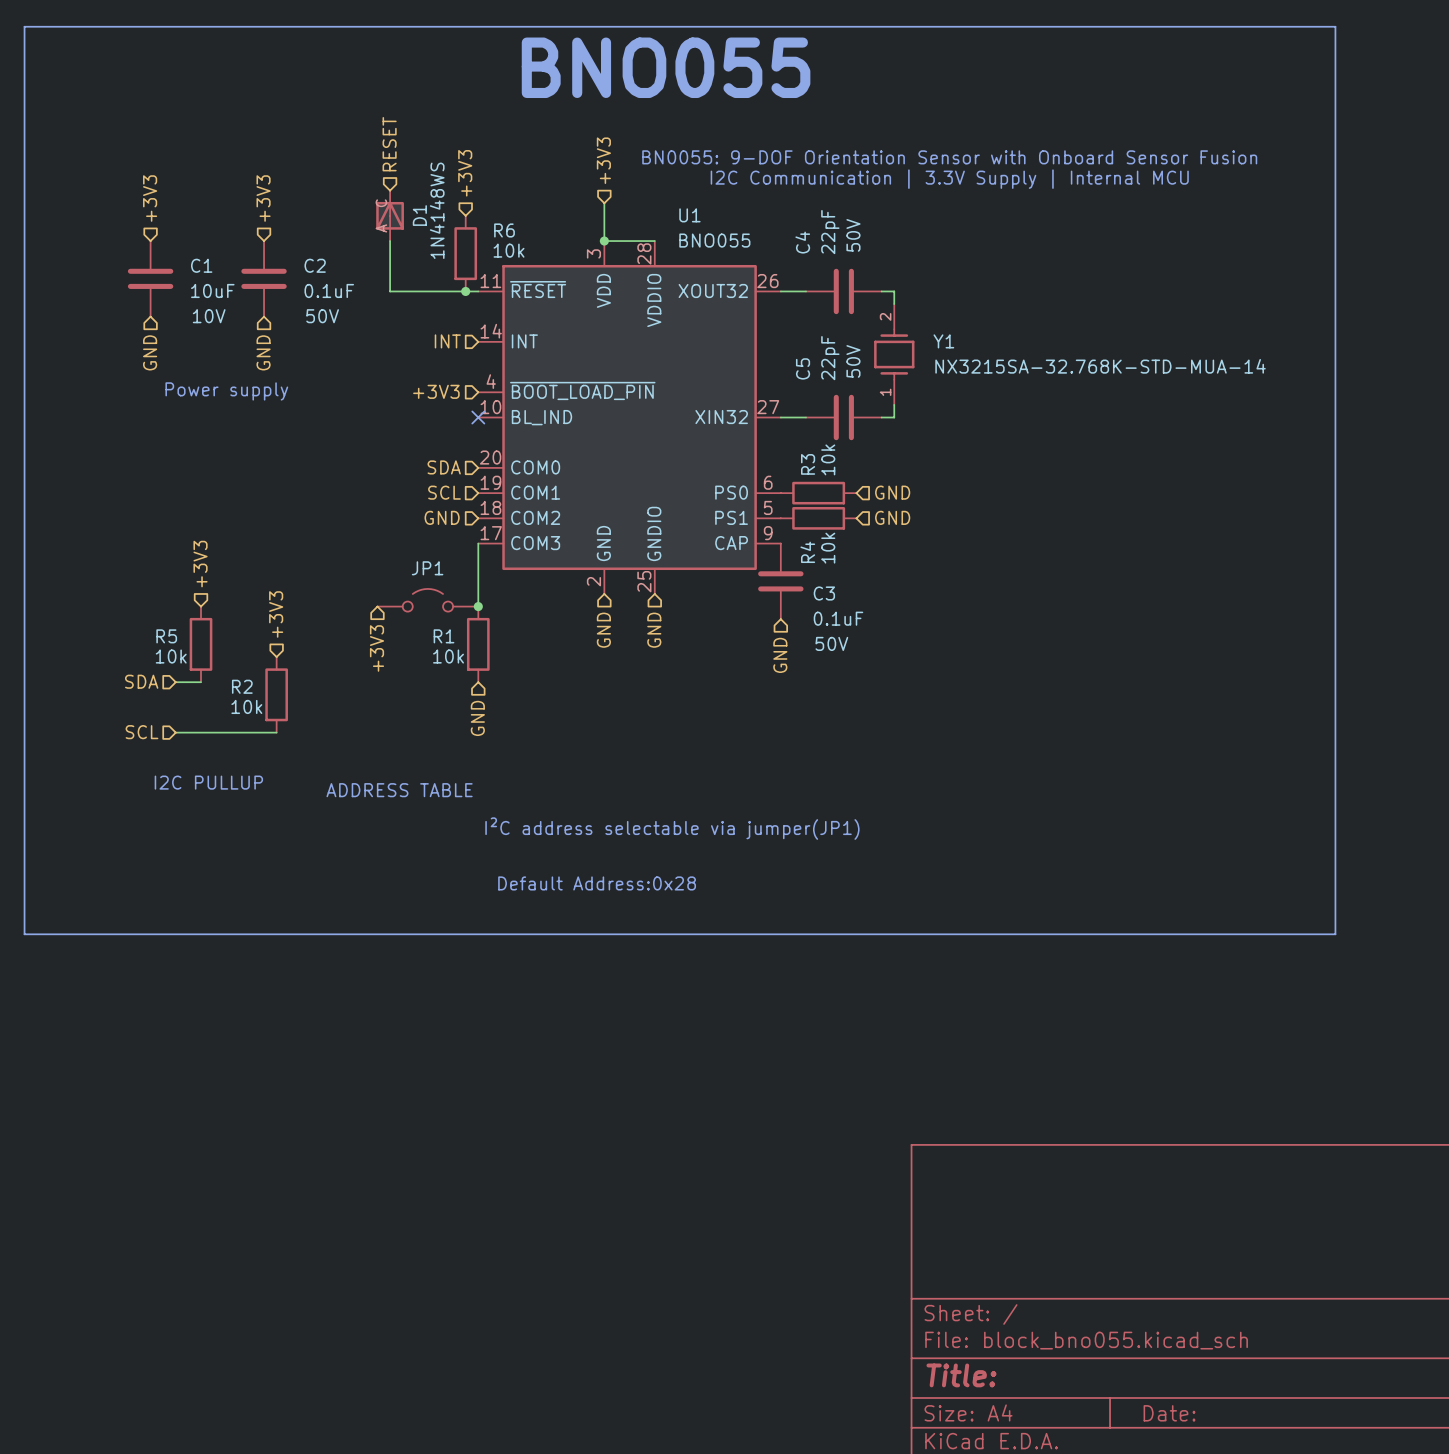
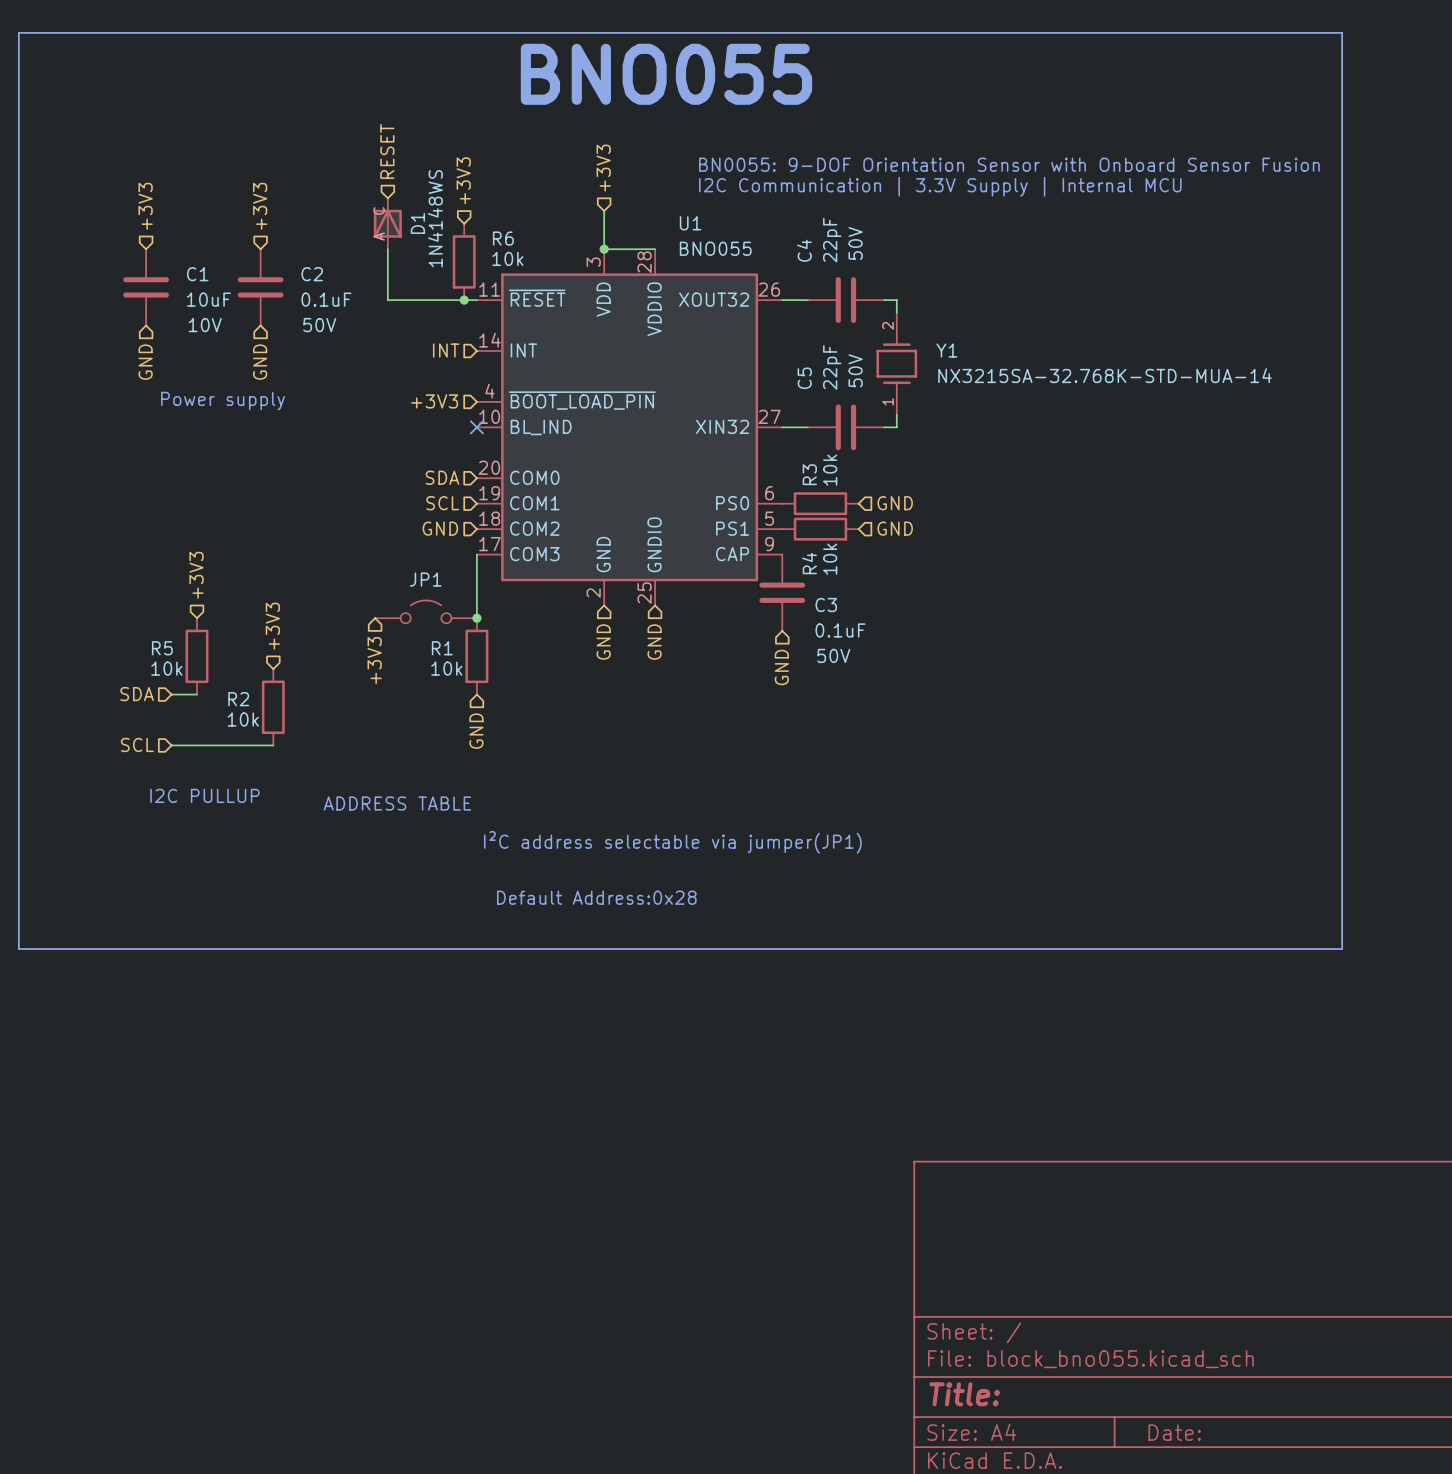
text: BN0055: 9-DOF Orientation Sensor with Onboard Sensor Fusion (949, 157) -> none
text: none -> BN0055: 9-DOF Orientation Sensor with Onboard Sensor Fusion (1009, 164)
text: none -> I2C Communication | 3.3V Supply | Internal MCU (940, 186)
text: I2C Communication | 3.3V Supply | Internal MCU (949, 179) -> none

